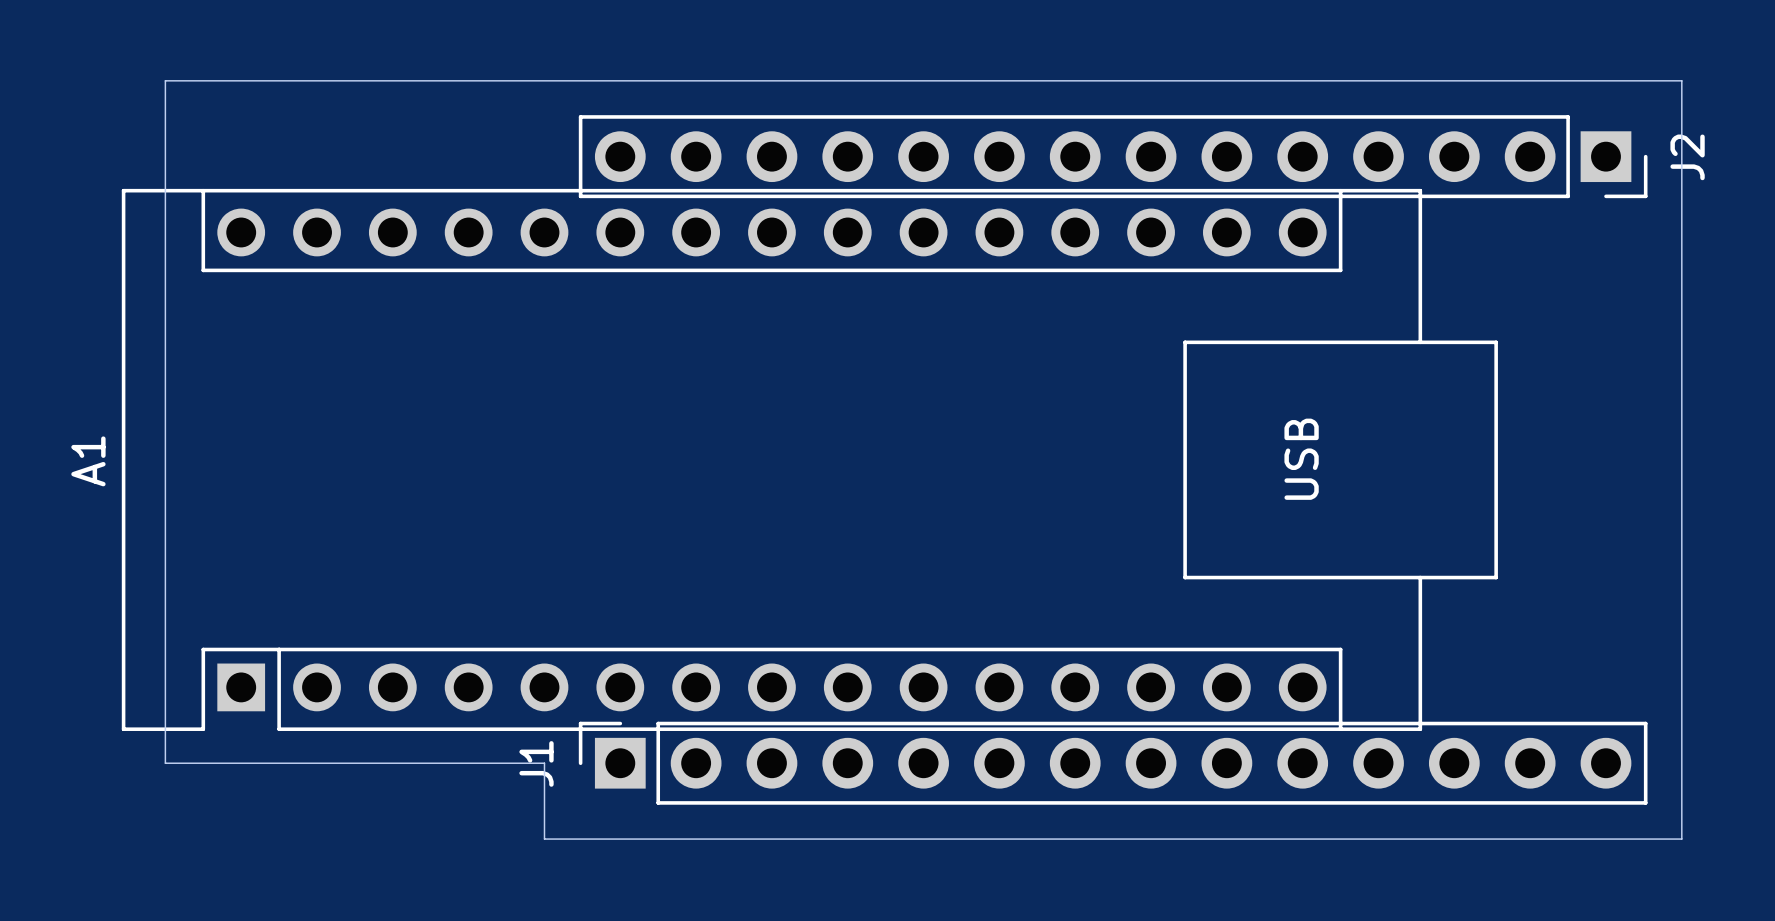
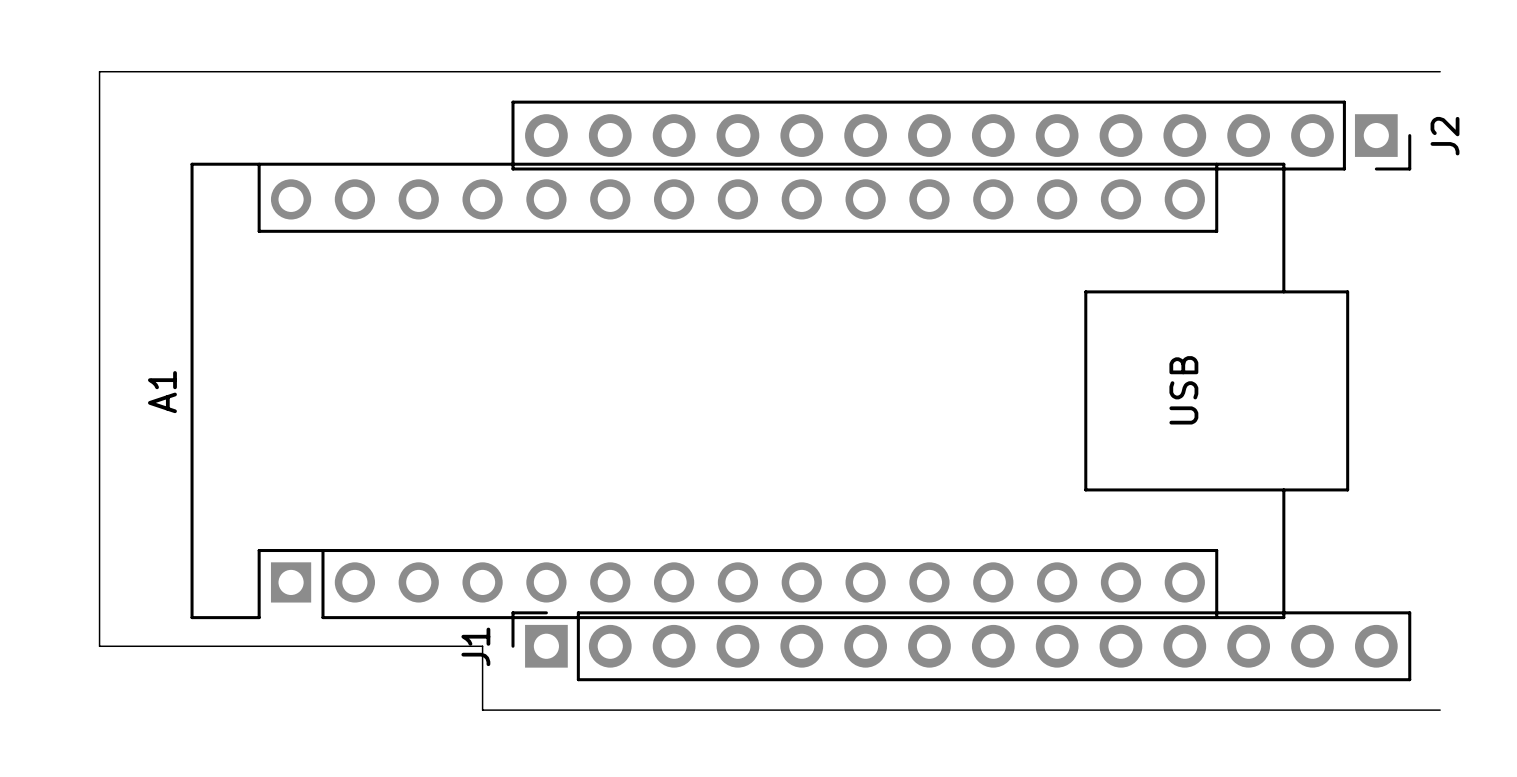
board edge: (165, 80) (165, 763) -> (163, 71) (99, 71) (99, 646) (163, 646)
board edge: (1681, 80) (1681, 839) -> none
A1 position: (809, 459) -> (769, 390)

